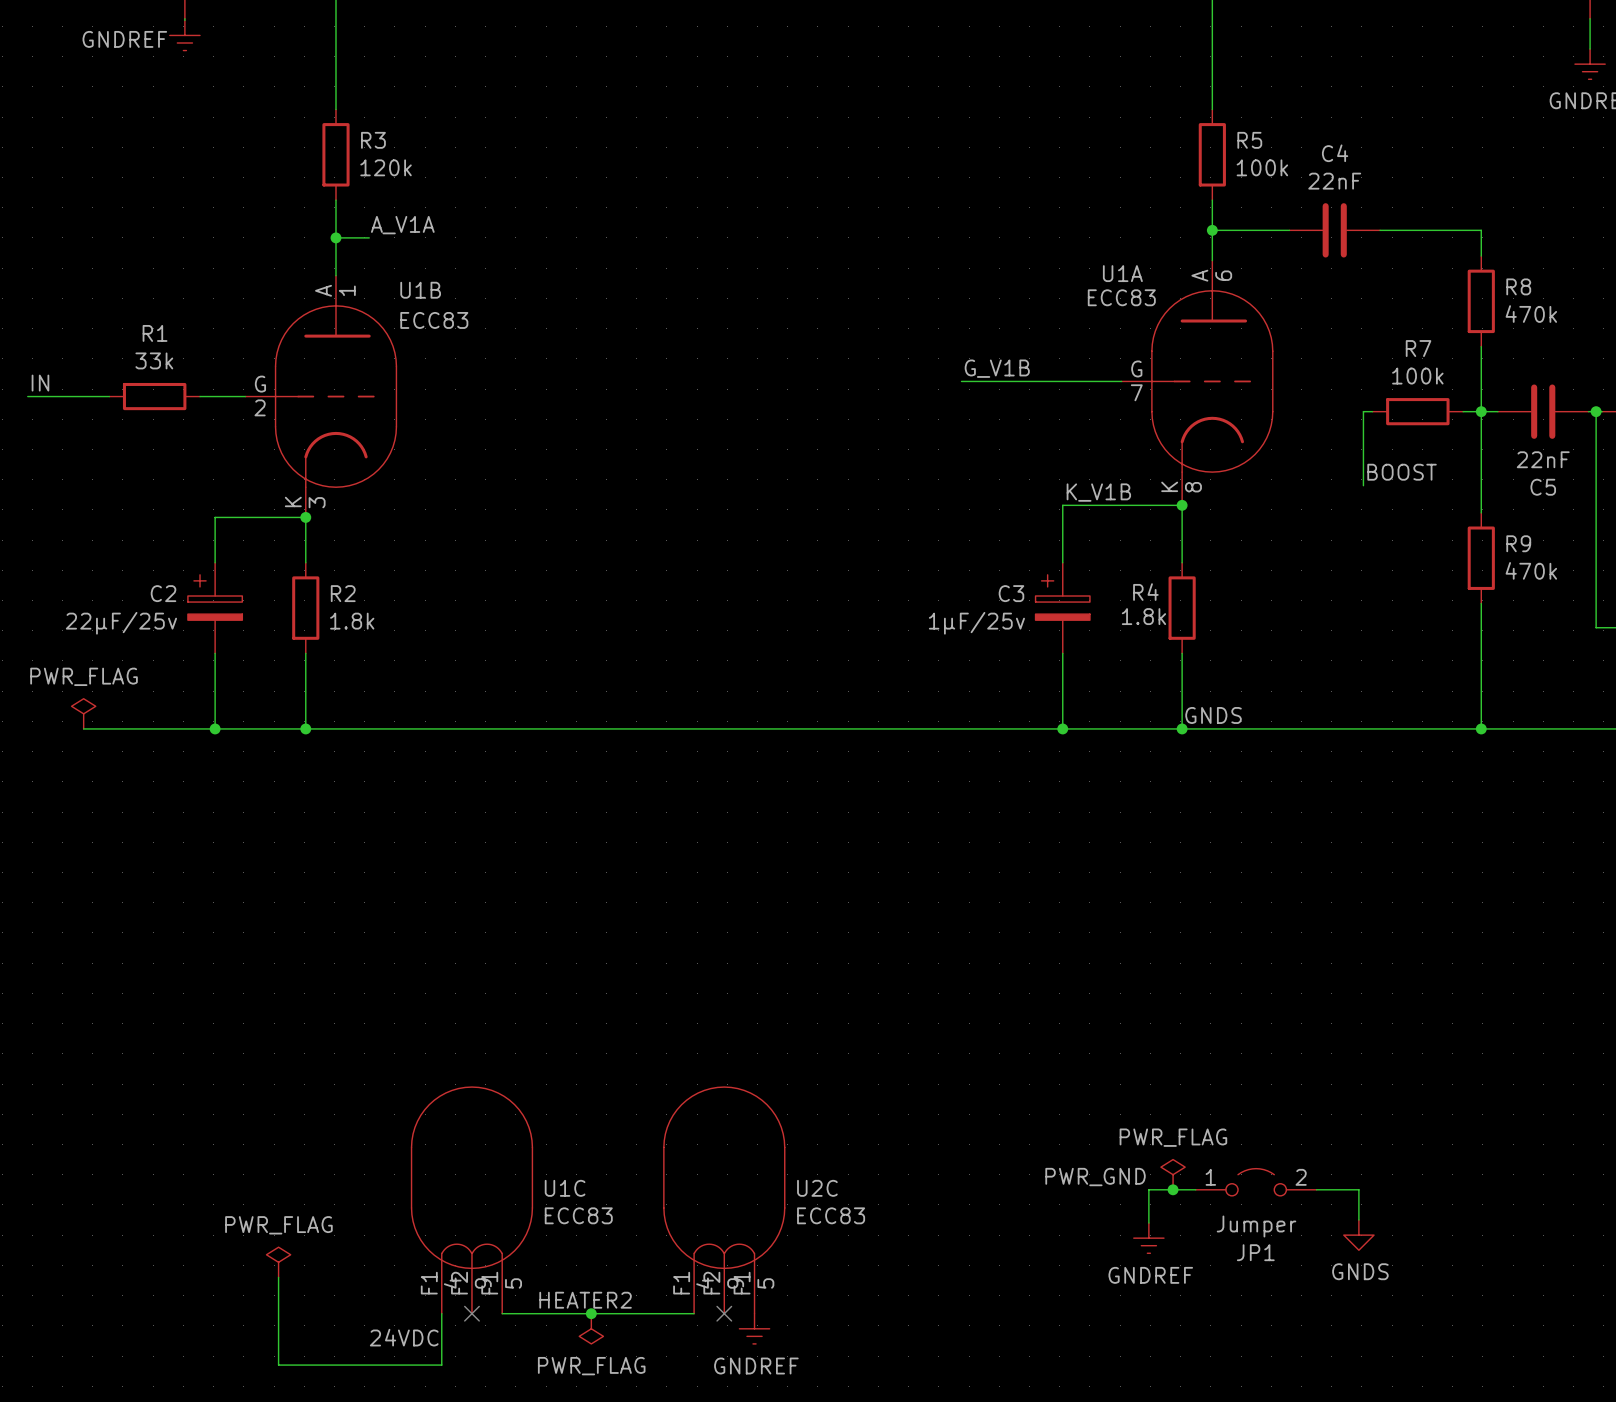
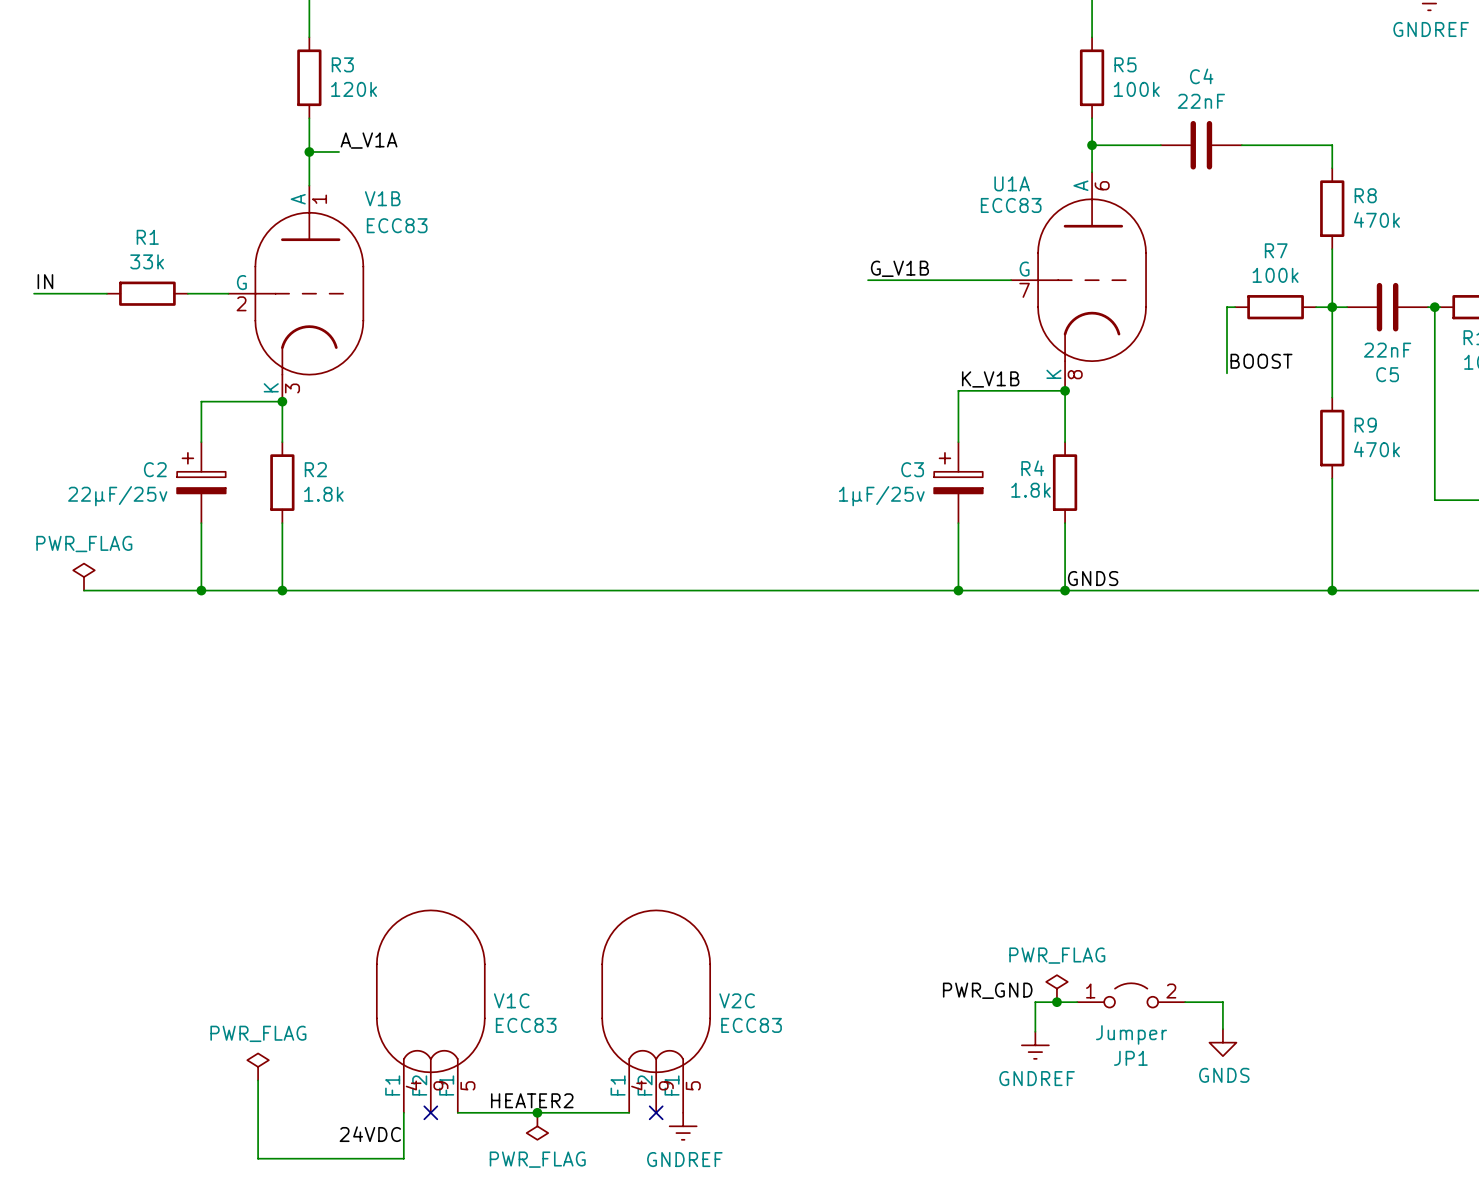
U1B name: U1B (420, 290) -> V1B (382, 198)
U1C name: U1C (565, 1188) -> V1C (511, 1000)
U2C name: U2C (817, 1188) -> V2C (737, 1000)

